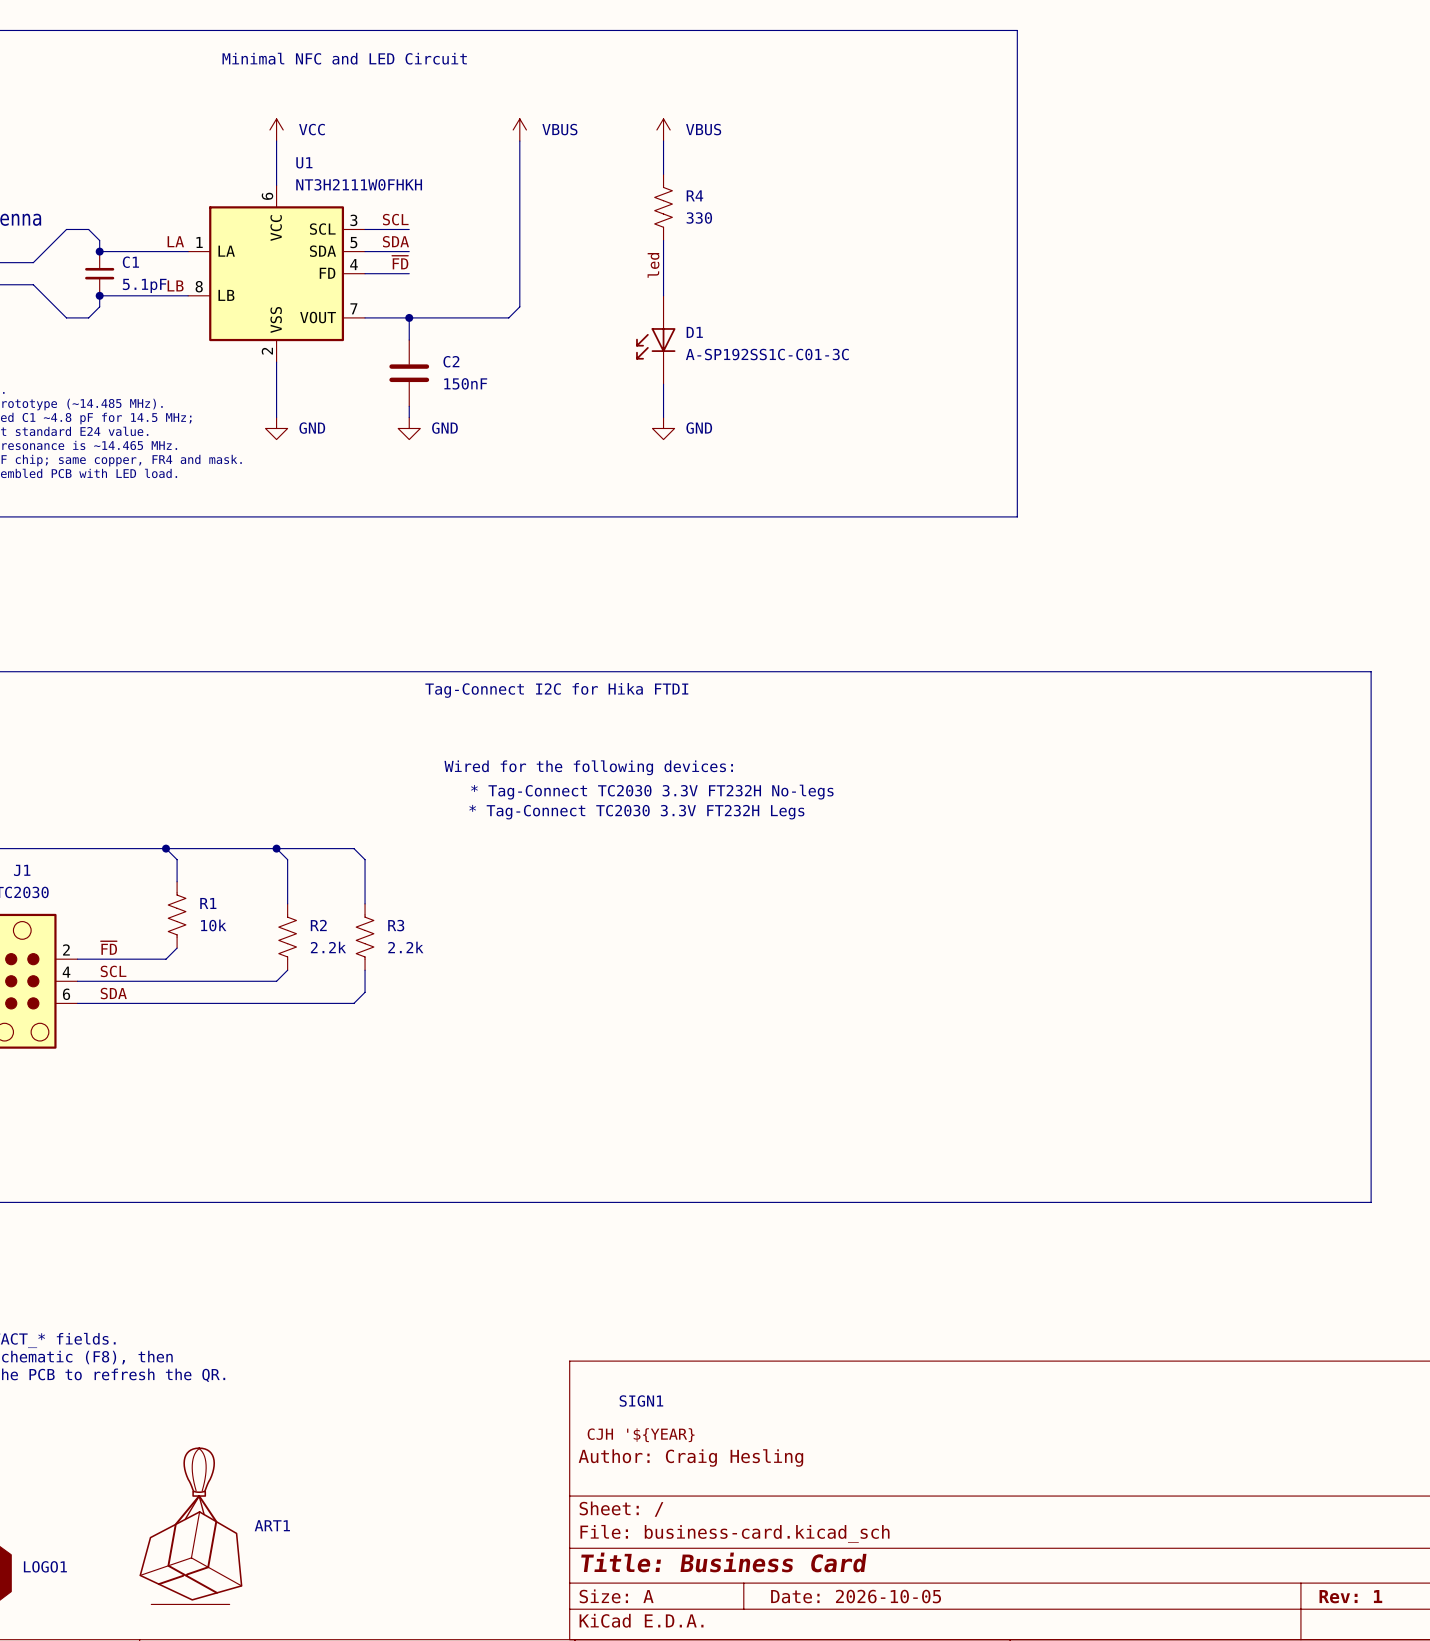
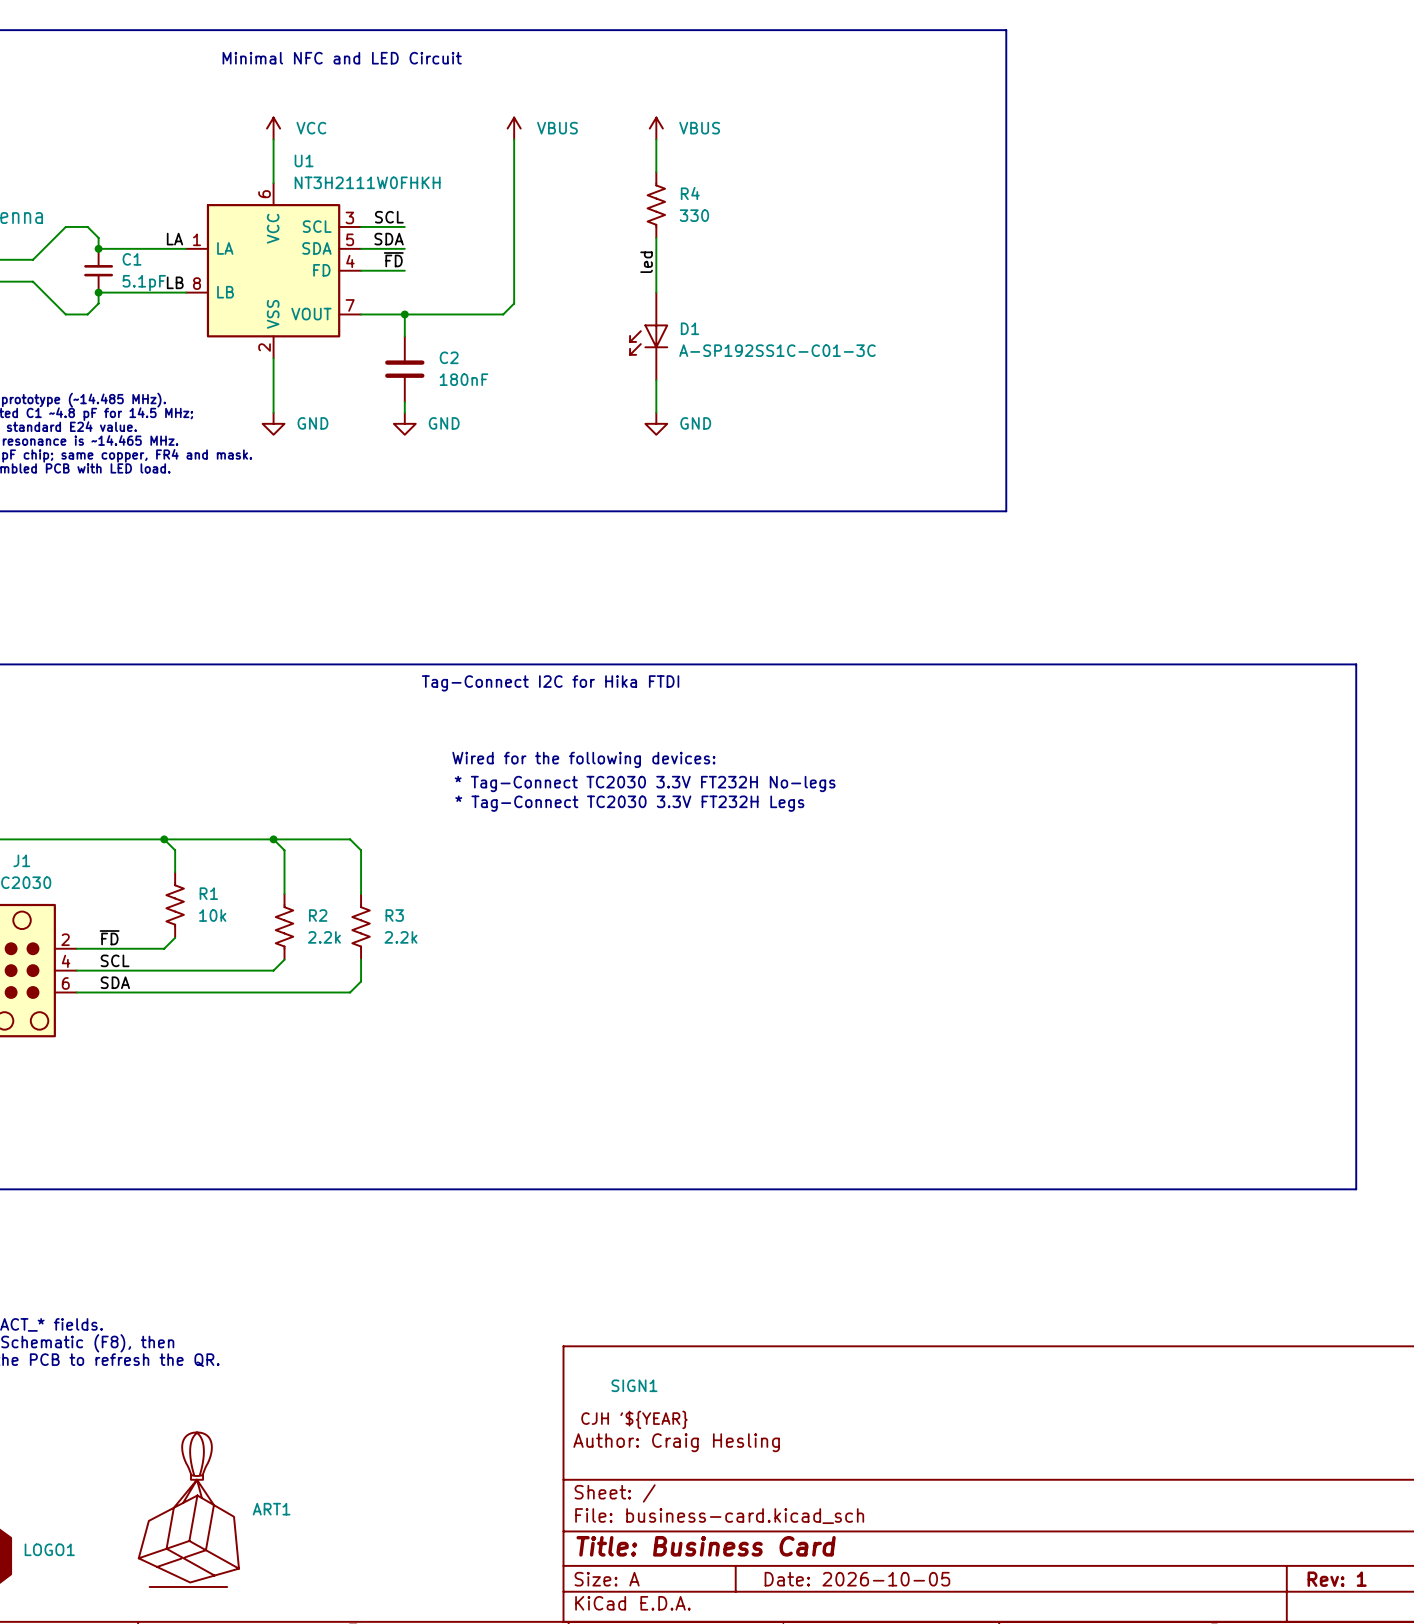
C2 value: 150nF (465, 383) -> 180nF (463, 379)

